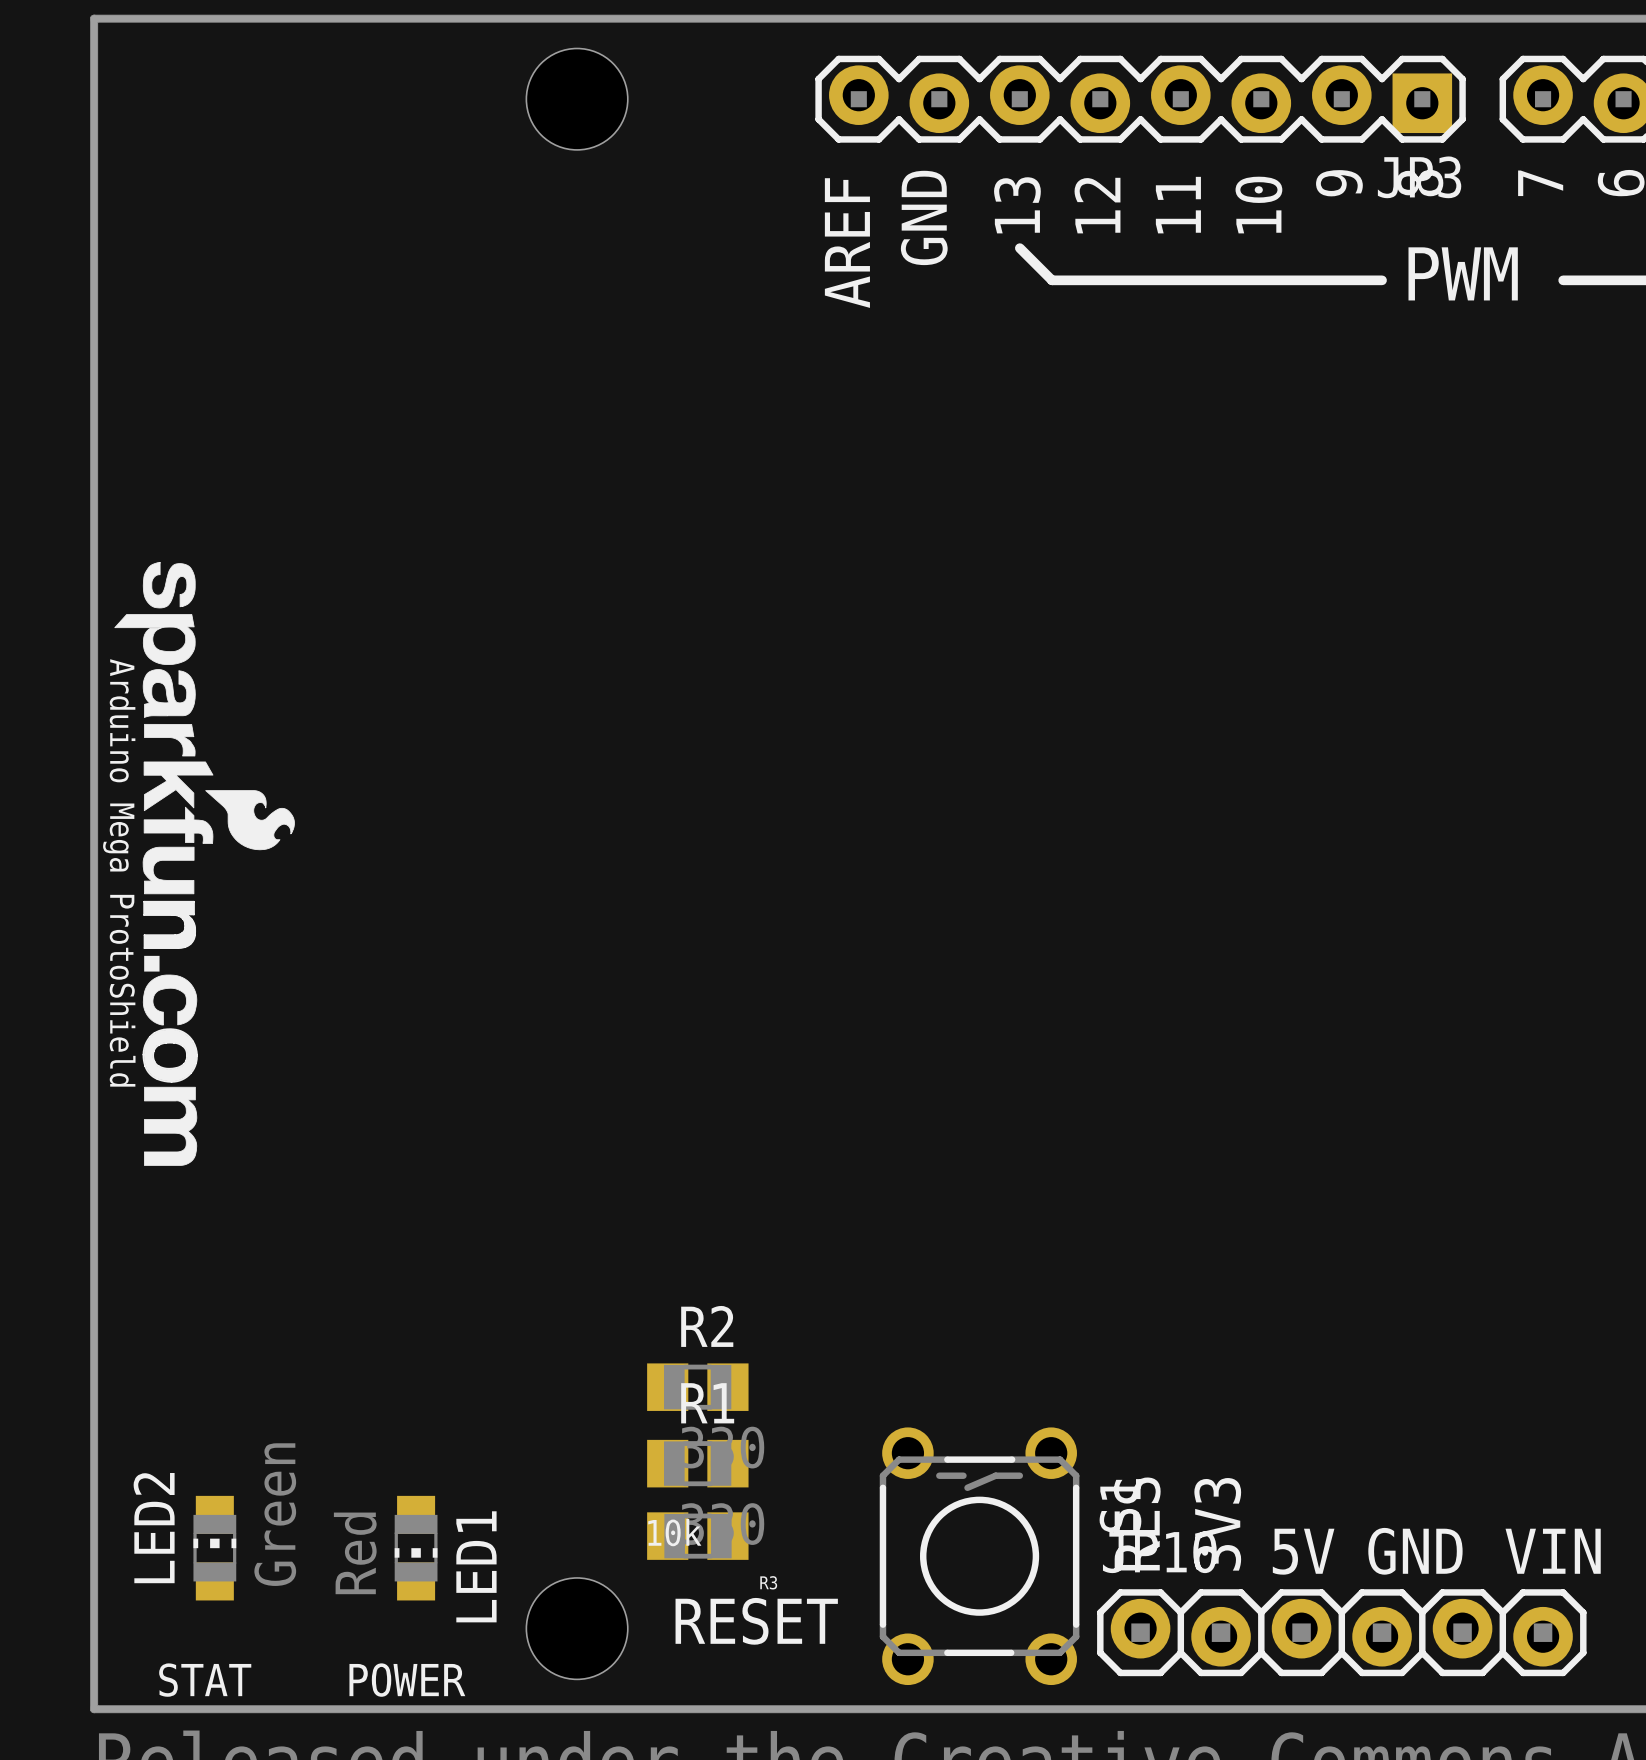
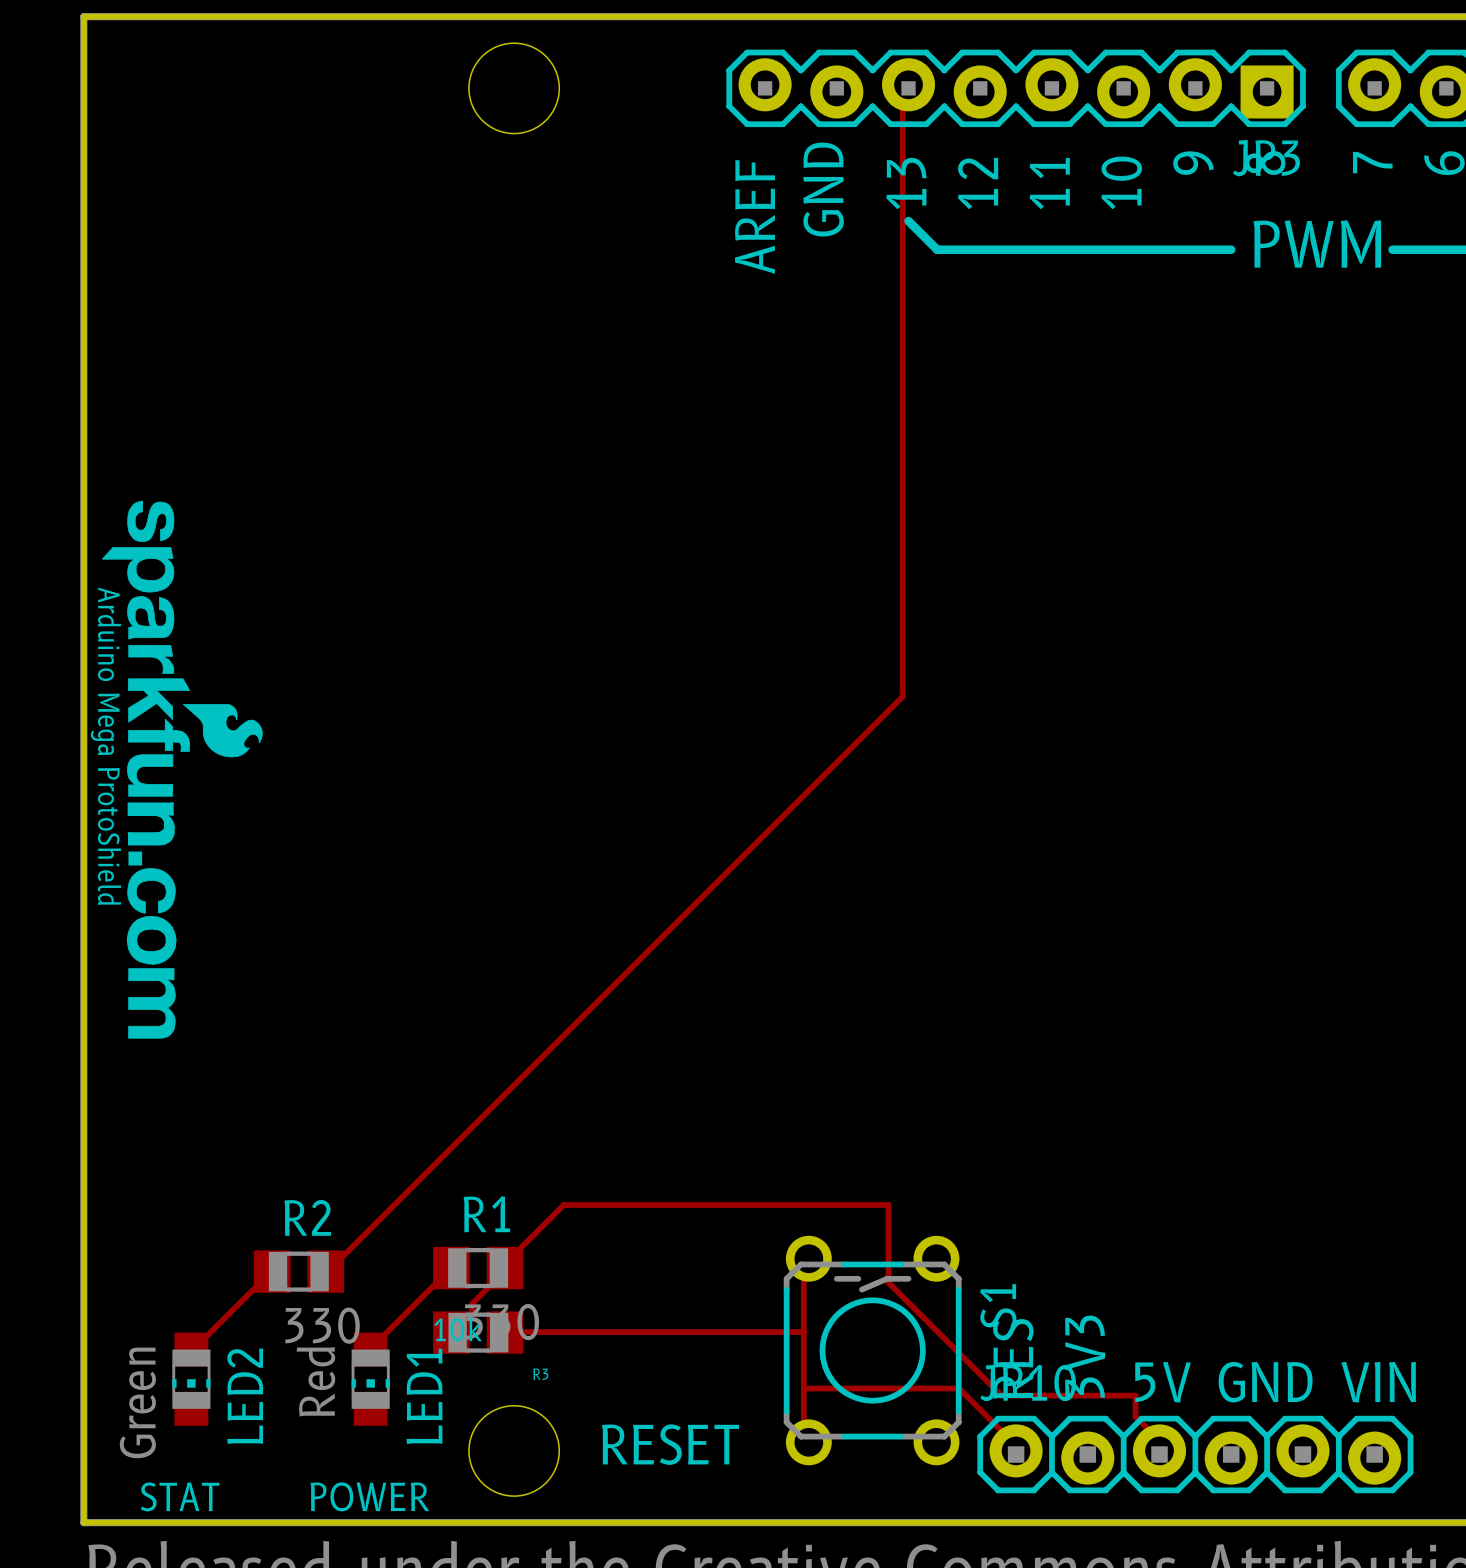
track: none -> (908, 84) (902, 89) (902, 696) (325, 1271)
R2 position: (697, 1387) -> (298, 1271)
track: none -> (808, 1258) (803, 1261) (803, 1437) (808, 1442)
track: none -> (451, 1268) (370, 1349)
track: none -> (272, 1271) (191, 1349)
R1 position: (697, 1463) -> (478, 1268)
track: none -> (451, 1332) (457, 1332) (472, 1317) (472, 1303) (500, 1275) (500, 1268) (505, 1268) (507, 1261) (563, 1205) (888, 1205) (888, 1282) (1001, 1395) (1135, 1395) (1135, 1416) (1156, 1437) (1159, 1450)
track: none -> (803, 1332) (505, 1332)
R3 position: (697, 1536) -> (478, 1332)
LED2 rotation: 0° (214, 1548) -> 180° (191, 1379)
S1 position: (979, 1556) -> (872, 1350)
track: none -> (803, 1388) (959, 1388) (1015, 1445) (1016, 1450)

